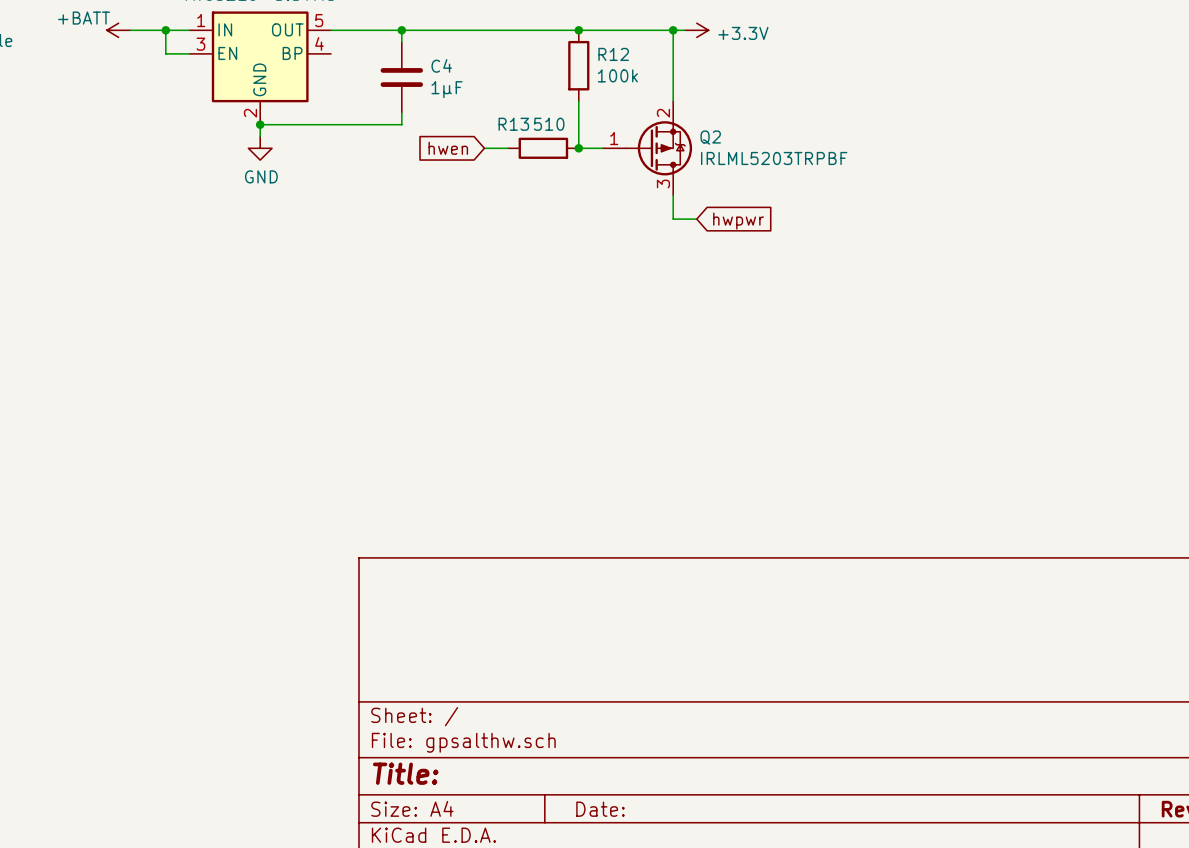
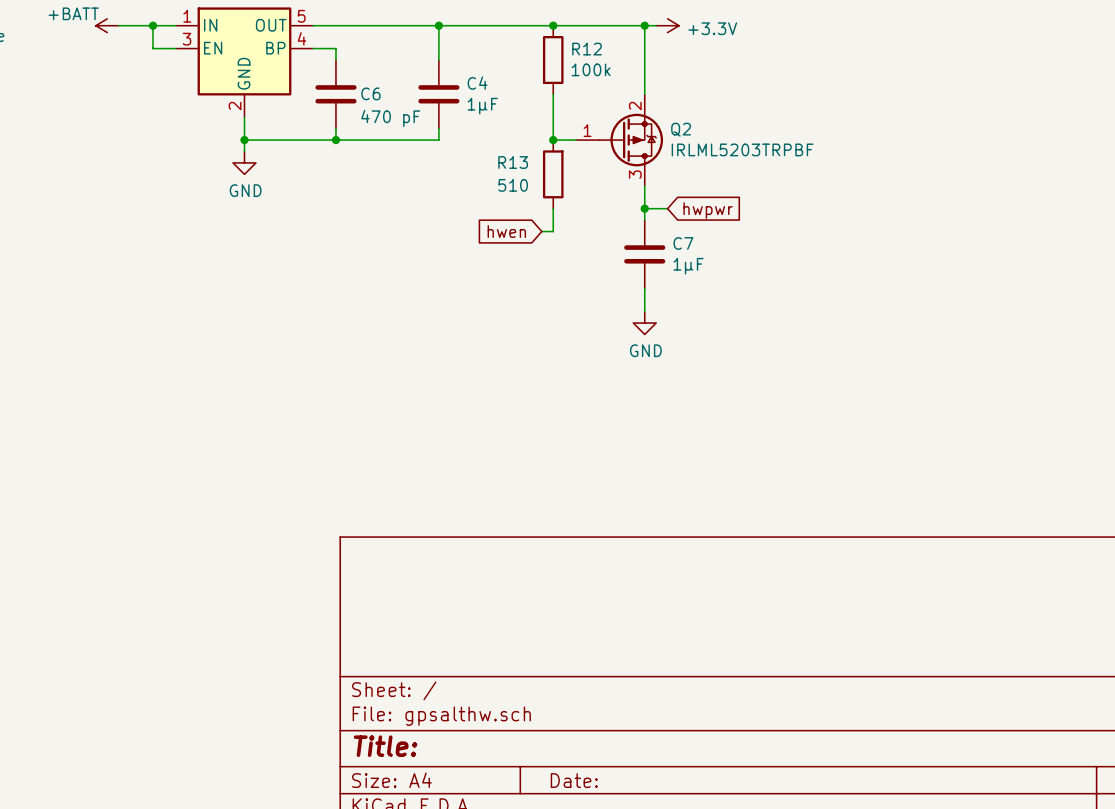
wire: (401, 30) (401, 42) -> (335, 128) (335, 140)
junction: (401, 30) -> none
wire: none -> (438, 25) (438, 60)
junction: none -> (438, 25)
wire: none -> (313, 48) (335, 48) (335, 60)
C4 position: (401, 77) -> (438, 94)
C6: none -> 470 pF (335, 94)
wire: (401, 112) (401, 124) (260, 124) -> none
junction position: (260, 124) -> (244, 140)
R13 value position: 510 (549, 124) -> 510 (513, 185)
wire: none -> (438, 128) (438, 140) (244, 140)
power symbol position: GND (260, 148) -> GND (244, 162)
junction: none -> (335, 140)
global label position: hwen (448, 148) -> hwen (506, 231)
wire: (484, 148) (508, 148) -> none
R13 rotation: 0° (543, 148) -> 90° clockwise (553, 174)
R13 position: (543, 148) -> (553, 174)
wire: none -> (553, 208) (553, 231) (541, 231)
wire: none -> (644, 208) (644, 220)
junction: none -> (644, 208)
C7: none -> 1μF (644, 254)
wire: none -> (644, 288) (644, 311)
power symbol: none -> GND (644, 323)

